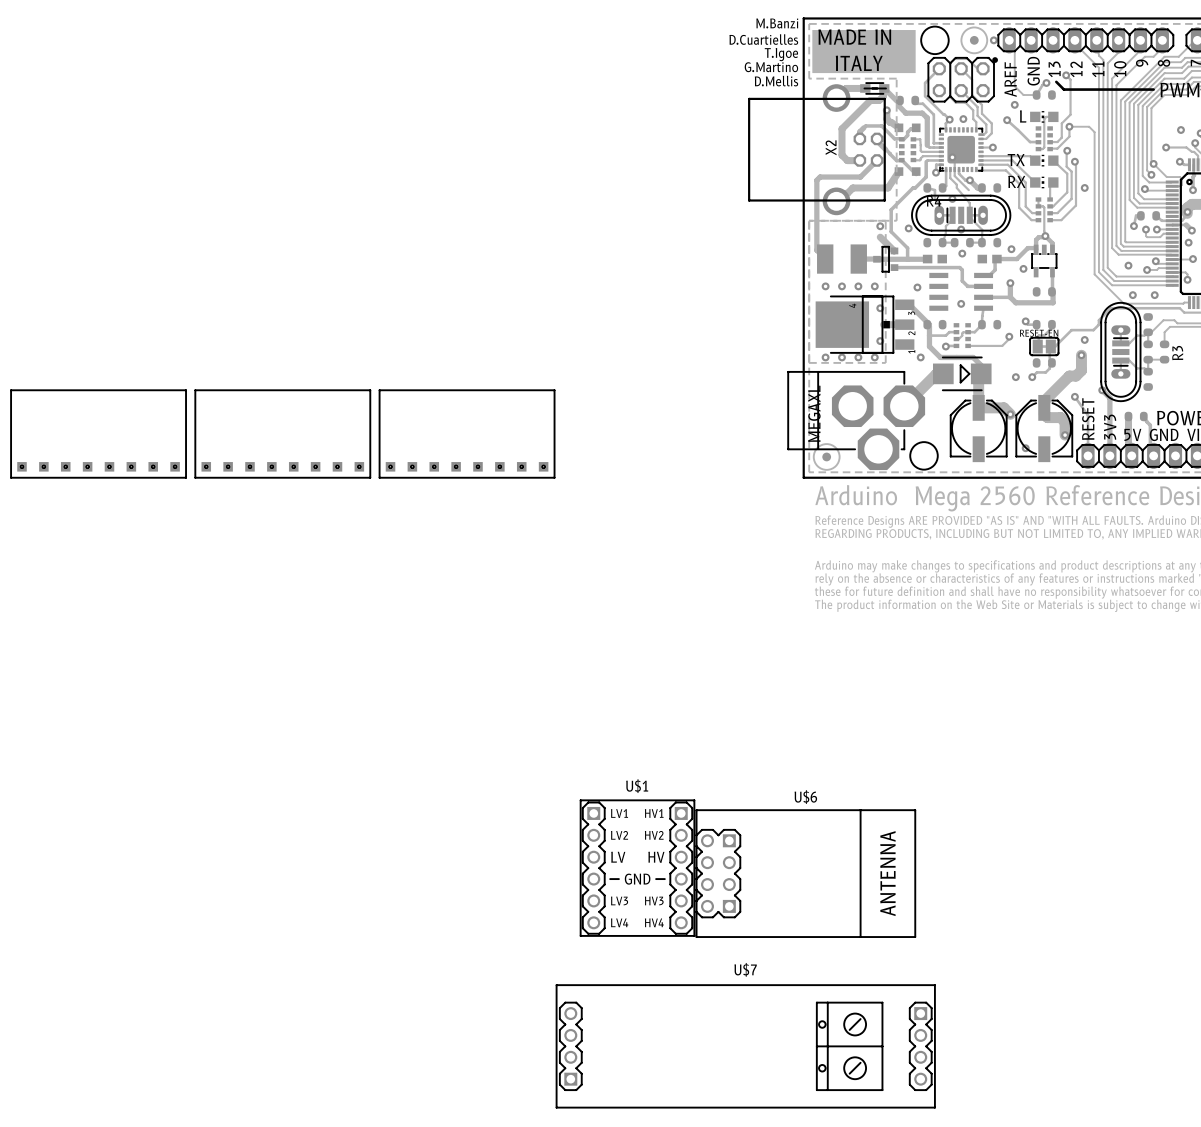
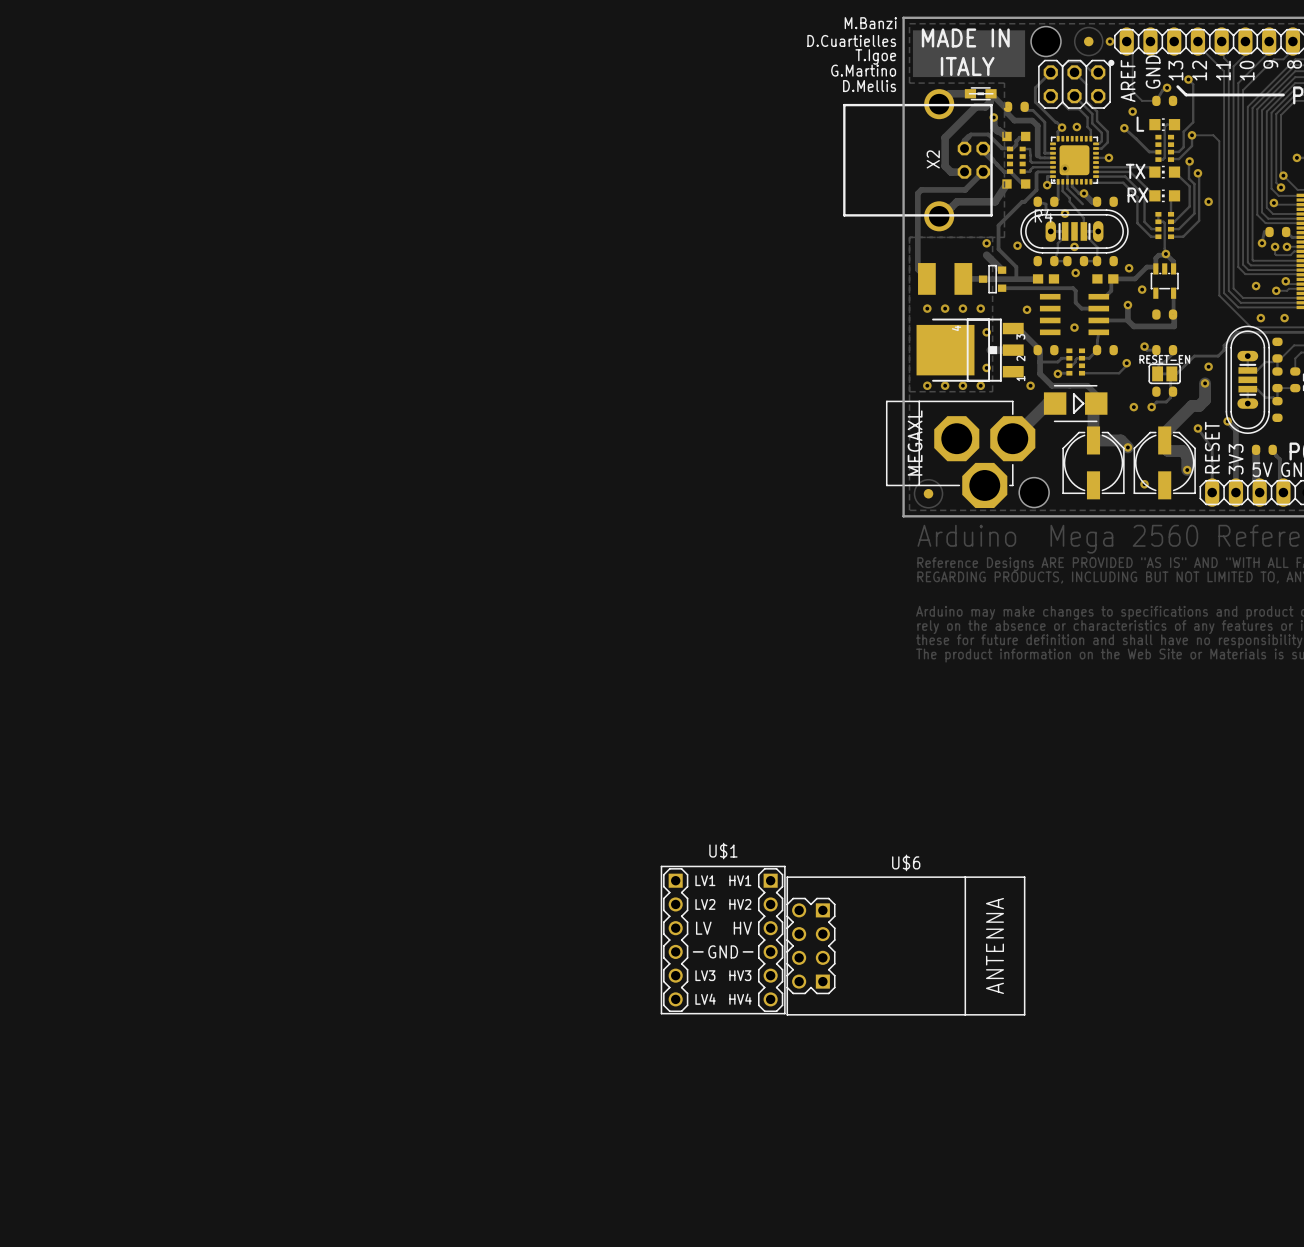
part: (98, 434) -> none
part: (282, 434) -> none
part: (467, 434) -> none
U$7: (745, 1046) -> none

